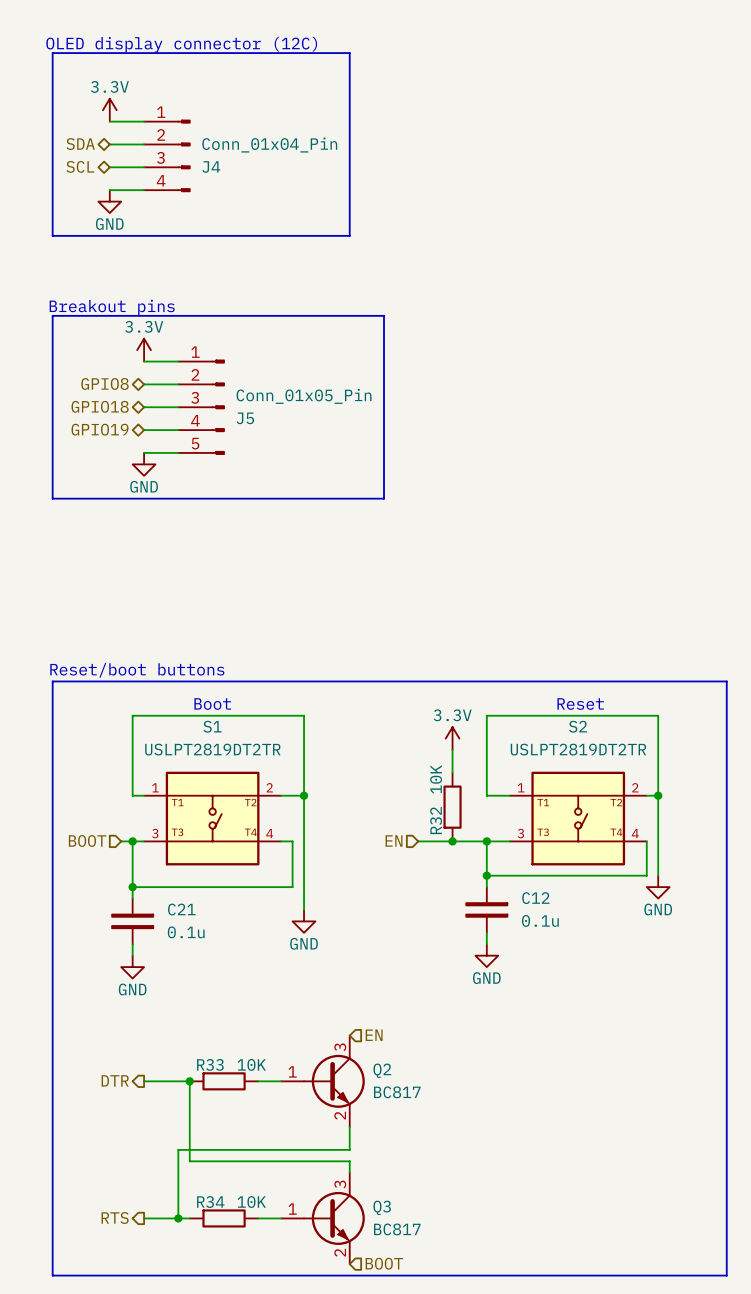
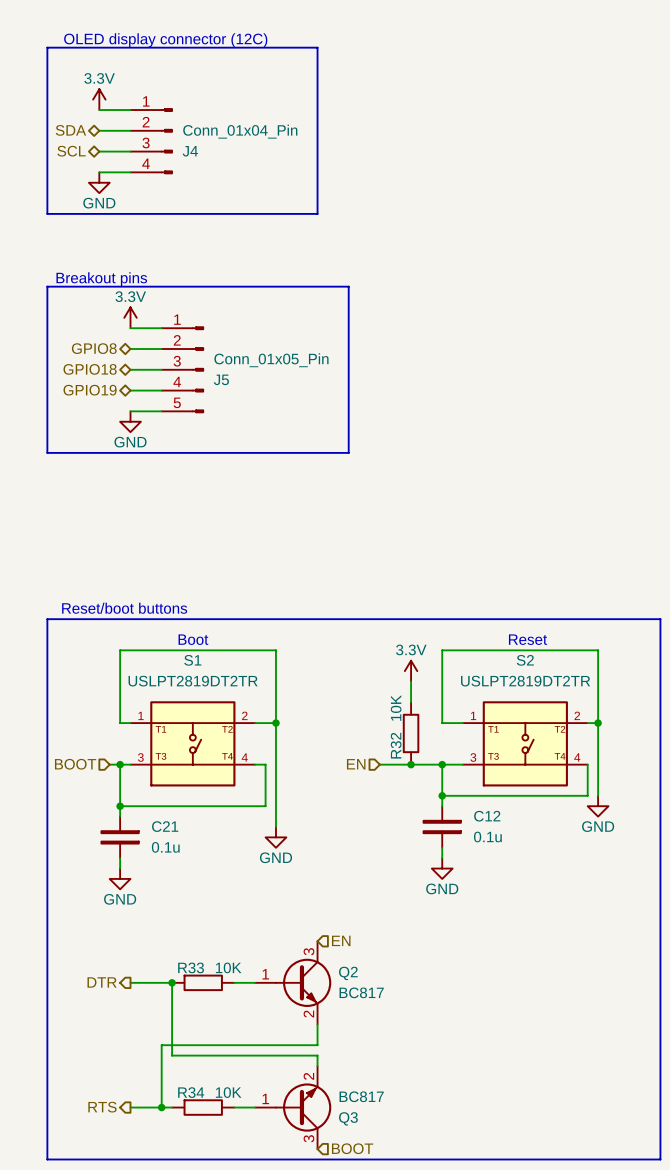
Q3 flip: as is (334, 1218) -> up-down (303, 1107)

